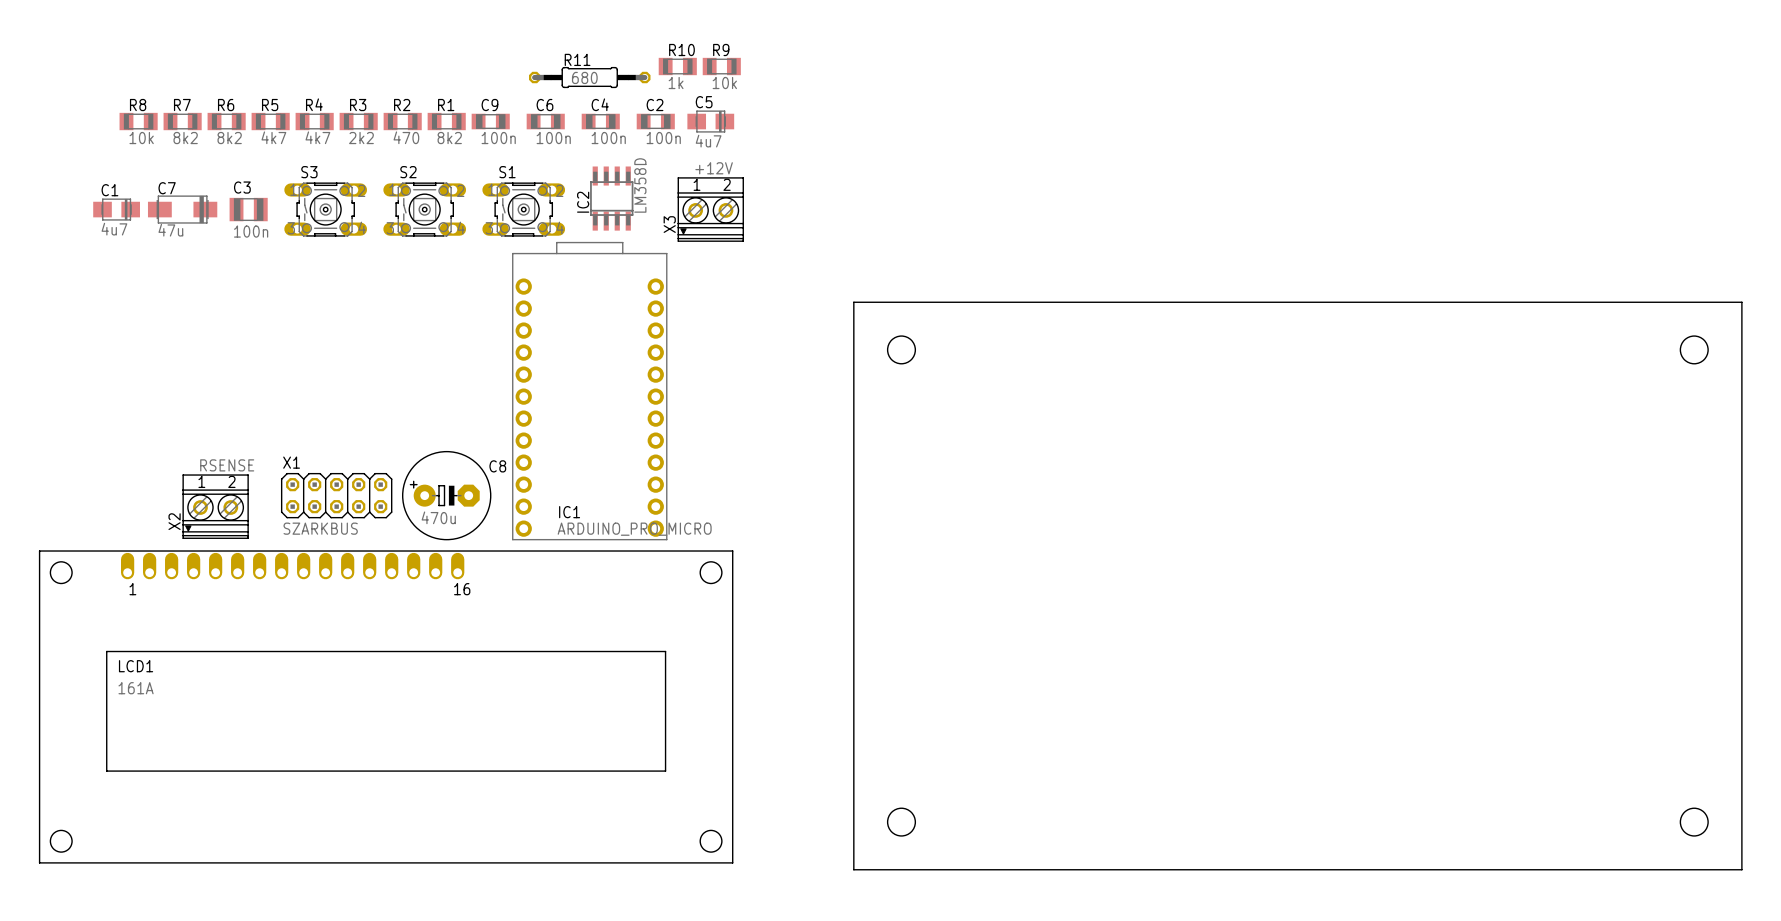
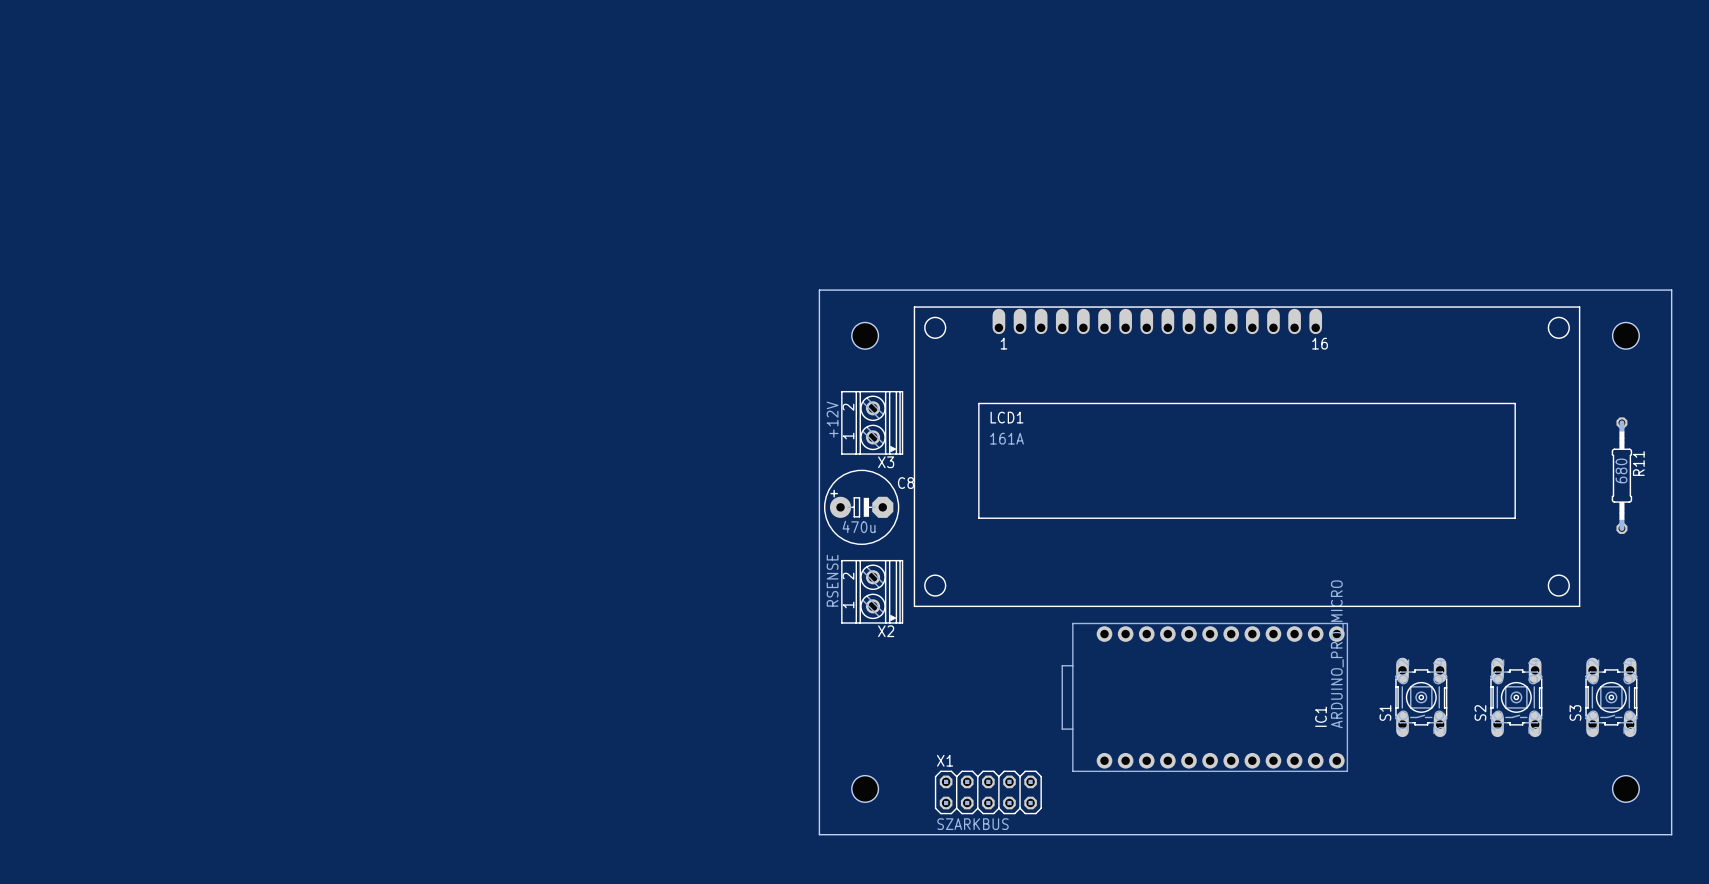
R10: 1k (677, 66) -> none
R9: 10k (721, 66) -> none
R11 rotation: 0° (589, 77) -> 90° clockwise (1621, 475)
R11 position: (589, 77) -> (1621, 475)
R8: 10k (138, 121) -> none
R7: 8k2 (182, 121) -> none
R6: 8k2 (226, 121) -> none
R5: 4k7 (270, 121) -> none
R4: 4k7 (314, 121) -> none
R3: 2k2 (358, 121) -> none
R2: 470 (402, 121) -> none
R1: 8k2 (446, 121) -> none
C9: 100n (490, 121) -> none
C6: 100n (545, 121) -> none
C4: 100n (600, 121) -> none
C2: 100n (655, 121) -> none
C5: 4u7 (710, 121) -> none
IC2: LM358D (611, 198) -> none
C1: 4u7 (116, 209) -> none
C7: 47u (182, 209) -> none
C3: 100n (248, 209) -> none
S3 rotation: 0° (325, 209) -> 90° counterclockwise (1611, 697)
S3 position: (325, 209) -> (1611, 697)
S2 rotation: 0° (424, 209) -> 90° counterclockwise (1516, 697)
S2 position: (424, 209) -> (1516, 697)
S1 rotation: 0° (523, 209) -> 90° counterclockwise (1421, 697)
S1 position: (523, 209) -> (1421, 697)
X3 rotation: 0° (710, 209) -> 90° counterclockwise (872, 422)
X3 position: (710, 209) -> (872, 422)
IC1 rotation: 0° (589, 391) -> 90° counterclockwise (1204, 697)
IC1 position: (589, 391) -> (1204, 697)
C8 footprint: [402, 450, 492, 541] -> [824, 469, 900, 545]
X1 position: (336, 495) -> (988, 792)
X2 rotation: 0° (215, 506) -> 90° counterclockwise (872, 591)
X2 position: (215, 506) -> (872, 591)
LCD1 position: (386, 706) -> (1247, 456)

